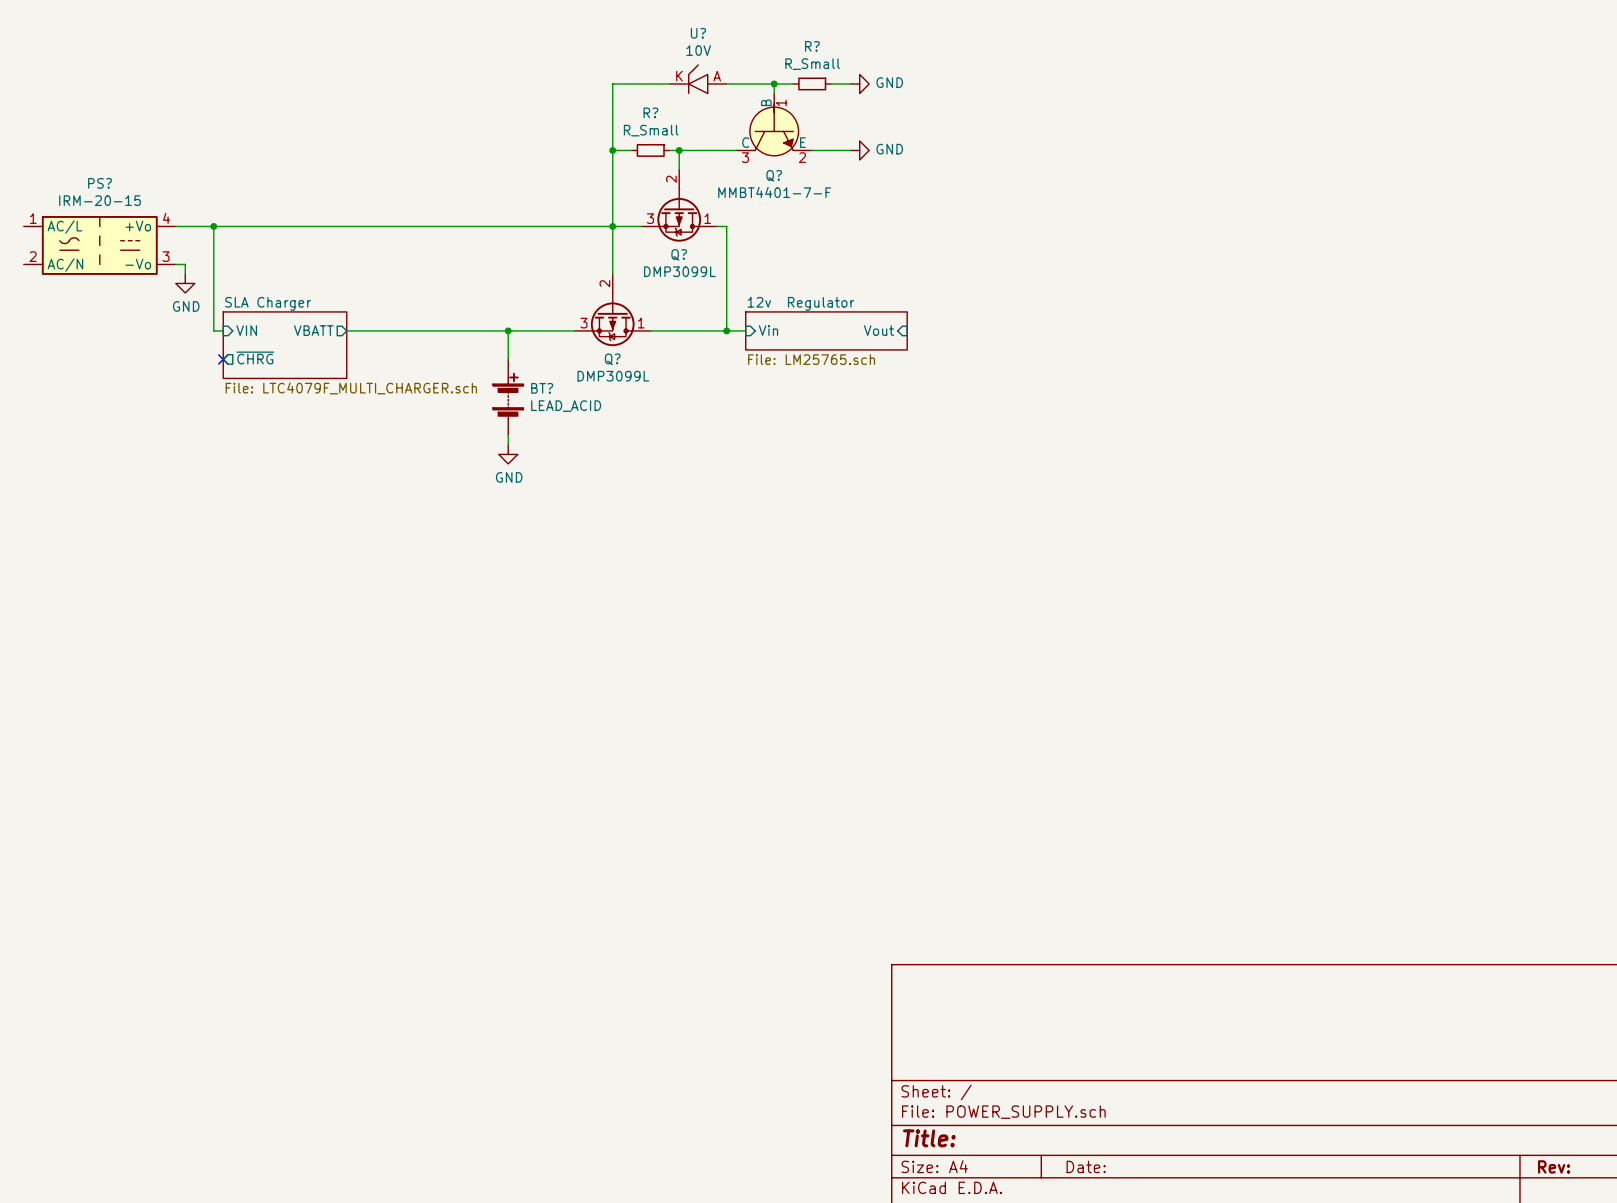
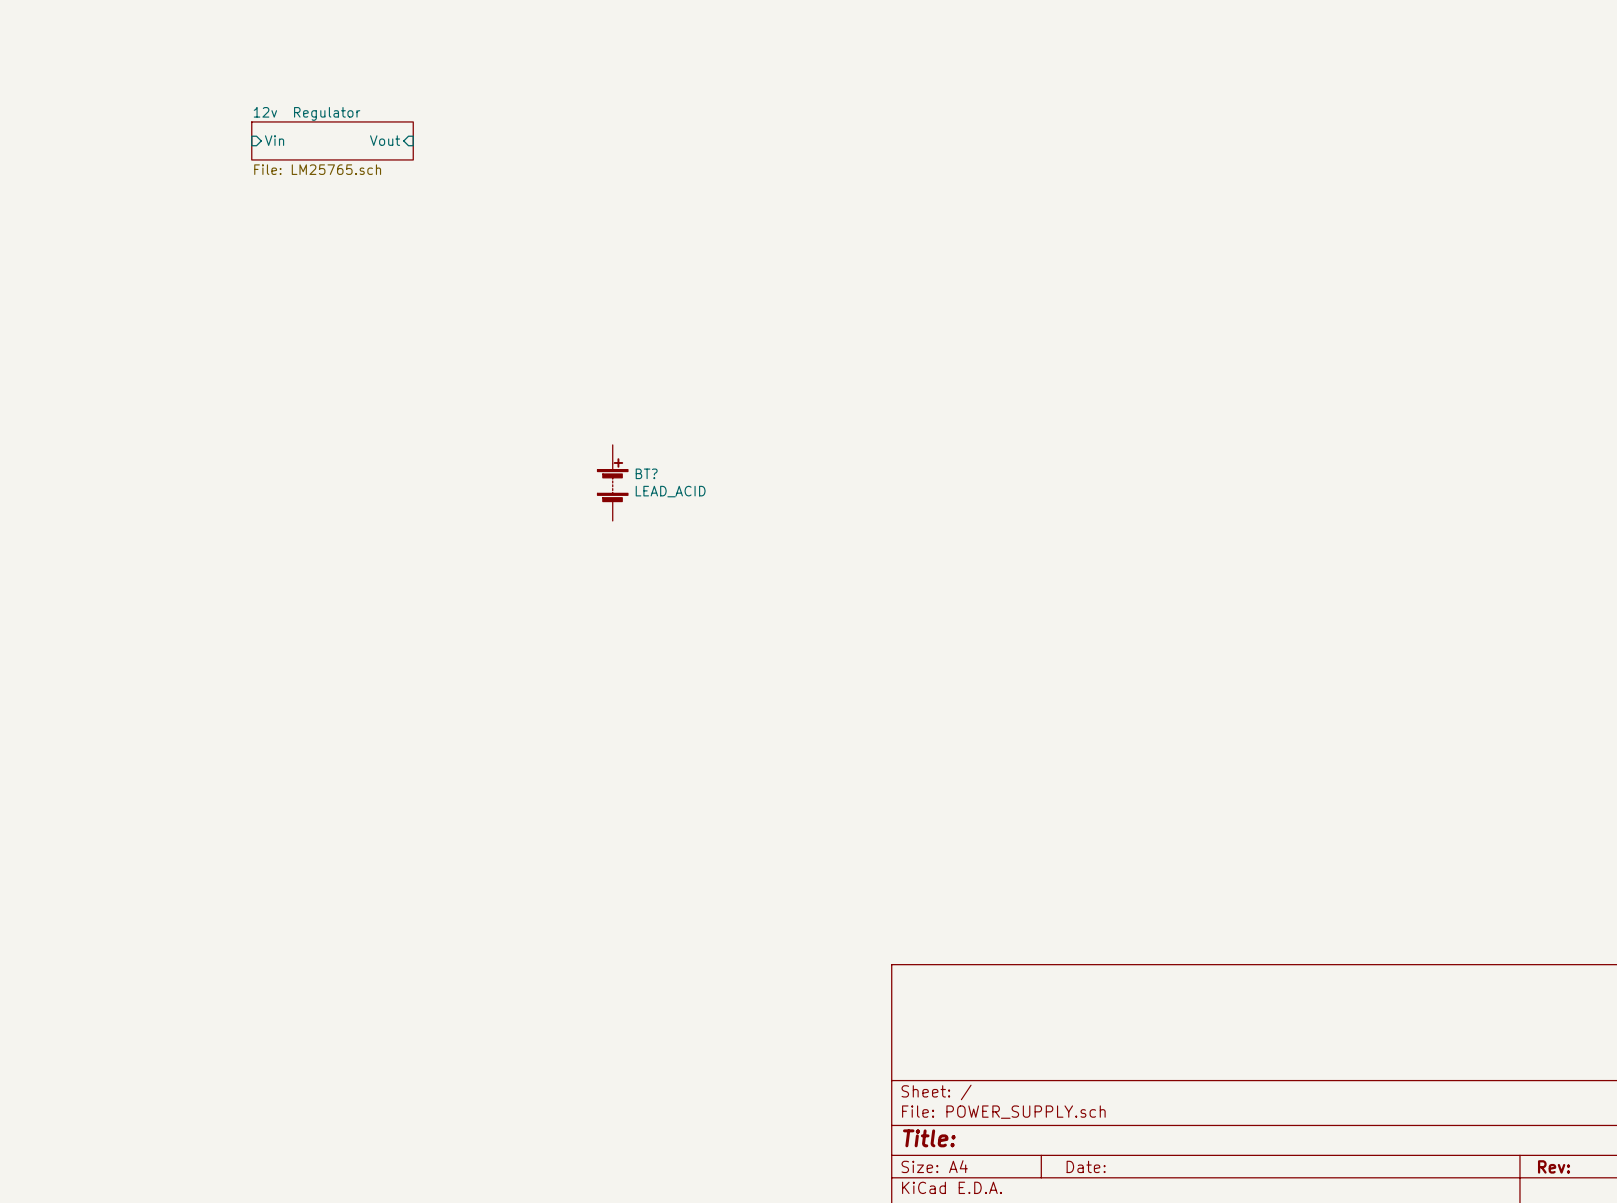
U?: 10V (698, 79) -> none
wire: (669, 83) (612, 83) (612, 273) -> none
wire: (726, 83) (793, 83) -> none
wire: (774, 83) (774, 93) -> none
junction: (774, 83) -> none
R?: R_Small (812, 83) -> none
wire: (831, 83) (850, 83) -> none
power symbol: GND (859, 83) -> none
Q?: MMBT4401-7-F (774, 124) -> none
sheet pin: none -> Vin (274, 140)
sheet pin: none -> Vout (385, 140)
wire: (612, 150) (631, 150) -> none
junction: (612, 150) -> none
R?: R_Small (650, 150) -> none
wire: (669, 150) (736, 150) -> none
wire: (679, 150) (679, 169) -> none
junction: (679, 150) -> none
wire: (812, 150) (850, 150) -> none
power symbol: GND (859, 150) -> none
Q?: DMP3099L (679, 205) -> none
wire: (175, 226) (641, 226) -> none
wire: (213, 226) (213, 330) (223, 330) -> none
junction: (213, 226) -> none
junction: (612, 226) -> none
wire: (717, 226) (726, 226) (726, 330) -> none
PS?: IRM-20-15 (99, 245) -> none
wire: (175, 264) (185, 264) (185, 273) -> none
power symbol: GND (185, 283) -> none
Q?: DMP3099L (612, 310) -> none
sheet pin: VIN (246, 330) -> none
sheet pin: VBATT (313, 330) -> none
wire: (346, 330) (574, 330) -> none
wire: (508, 330) (508, 359) -> none
junction: (508, 330) -> none
wire: (650, 330) (745, 330) -> none
junction: (726, 330) -> none
sheet pin: Vin (768, 330) -> none
sheet 12v Regulator position: (826, 330) -> (332, 140)
sheet pin: Vout (878, 330) -> none
sheet SLA Charger: File: LTC4079F_MULTI_CHARGER.sch (285, 345) -> none
sheet pin: ~{CHRG} (255, 357) -> none
no-connect mark: (223, 359) -> none
BT? position: (508, 397) -> (612, 482)
wire: (508, 435) (508, 444) -> none
power symbol: GND (508, 454) -> none

